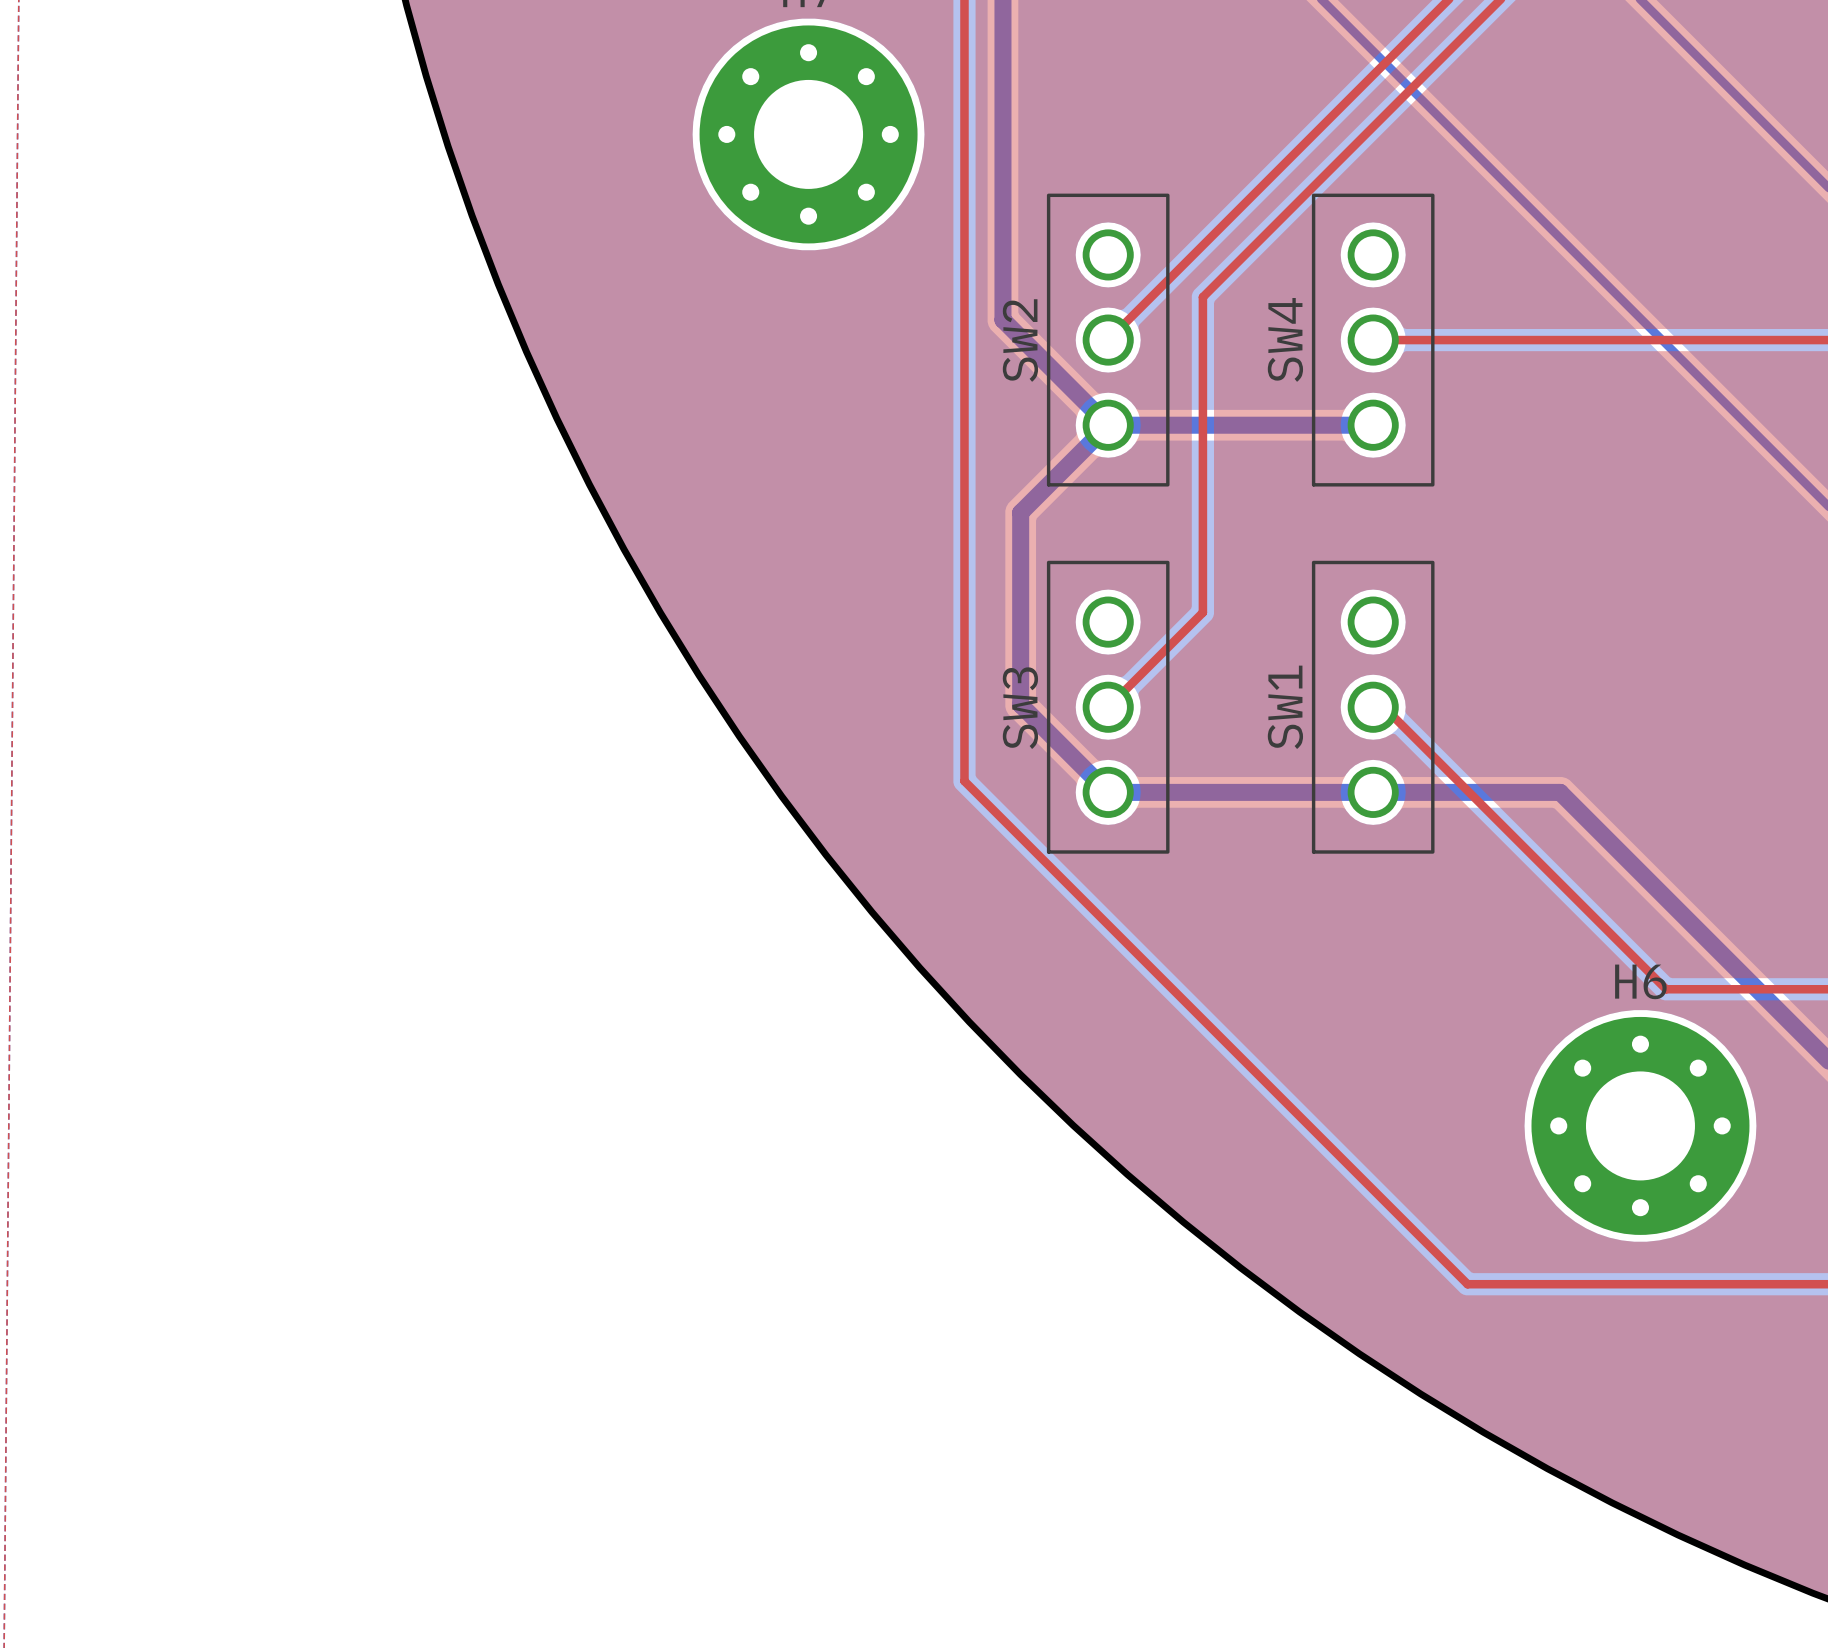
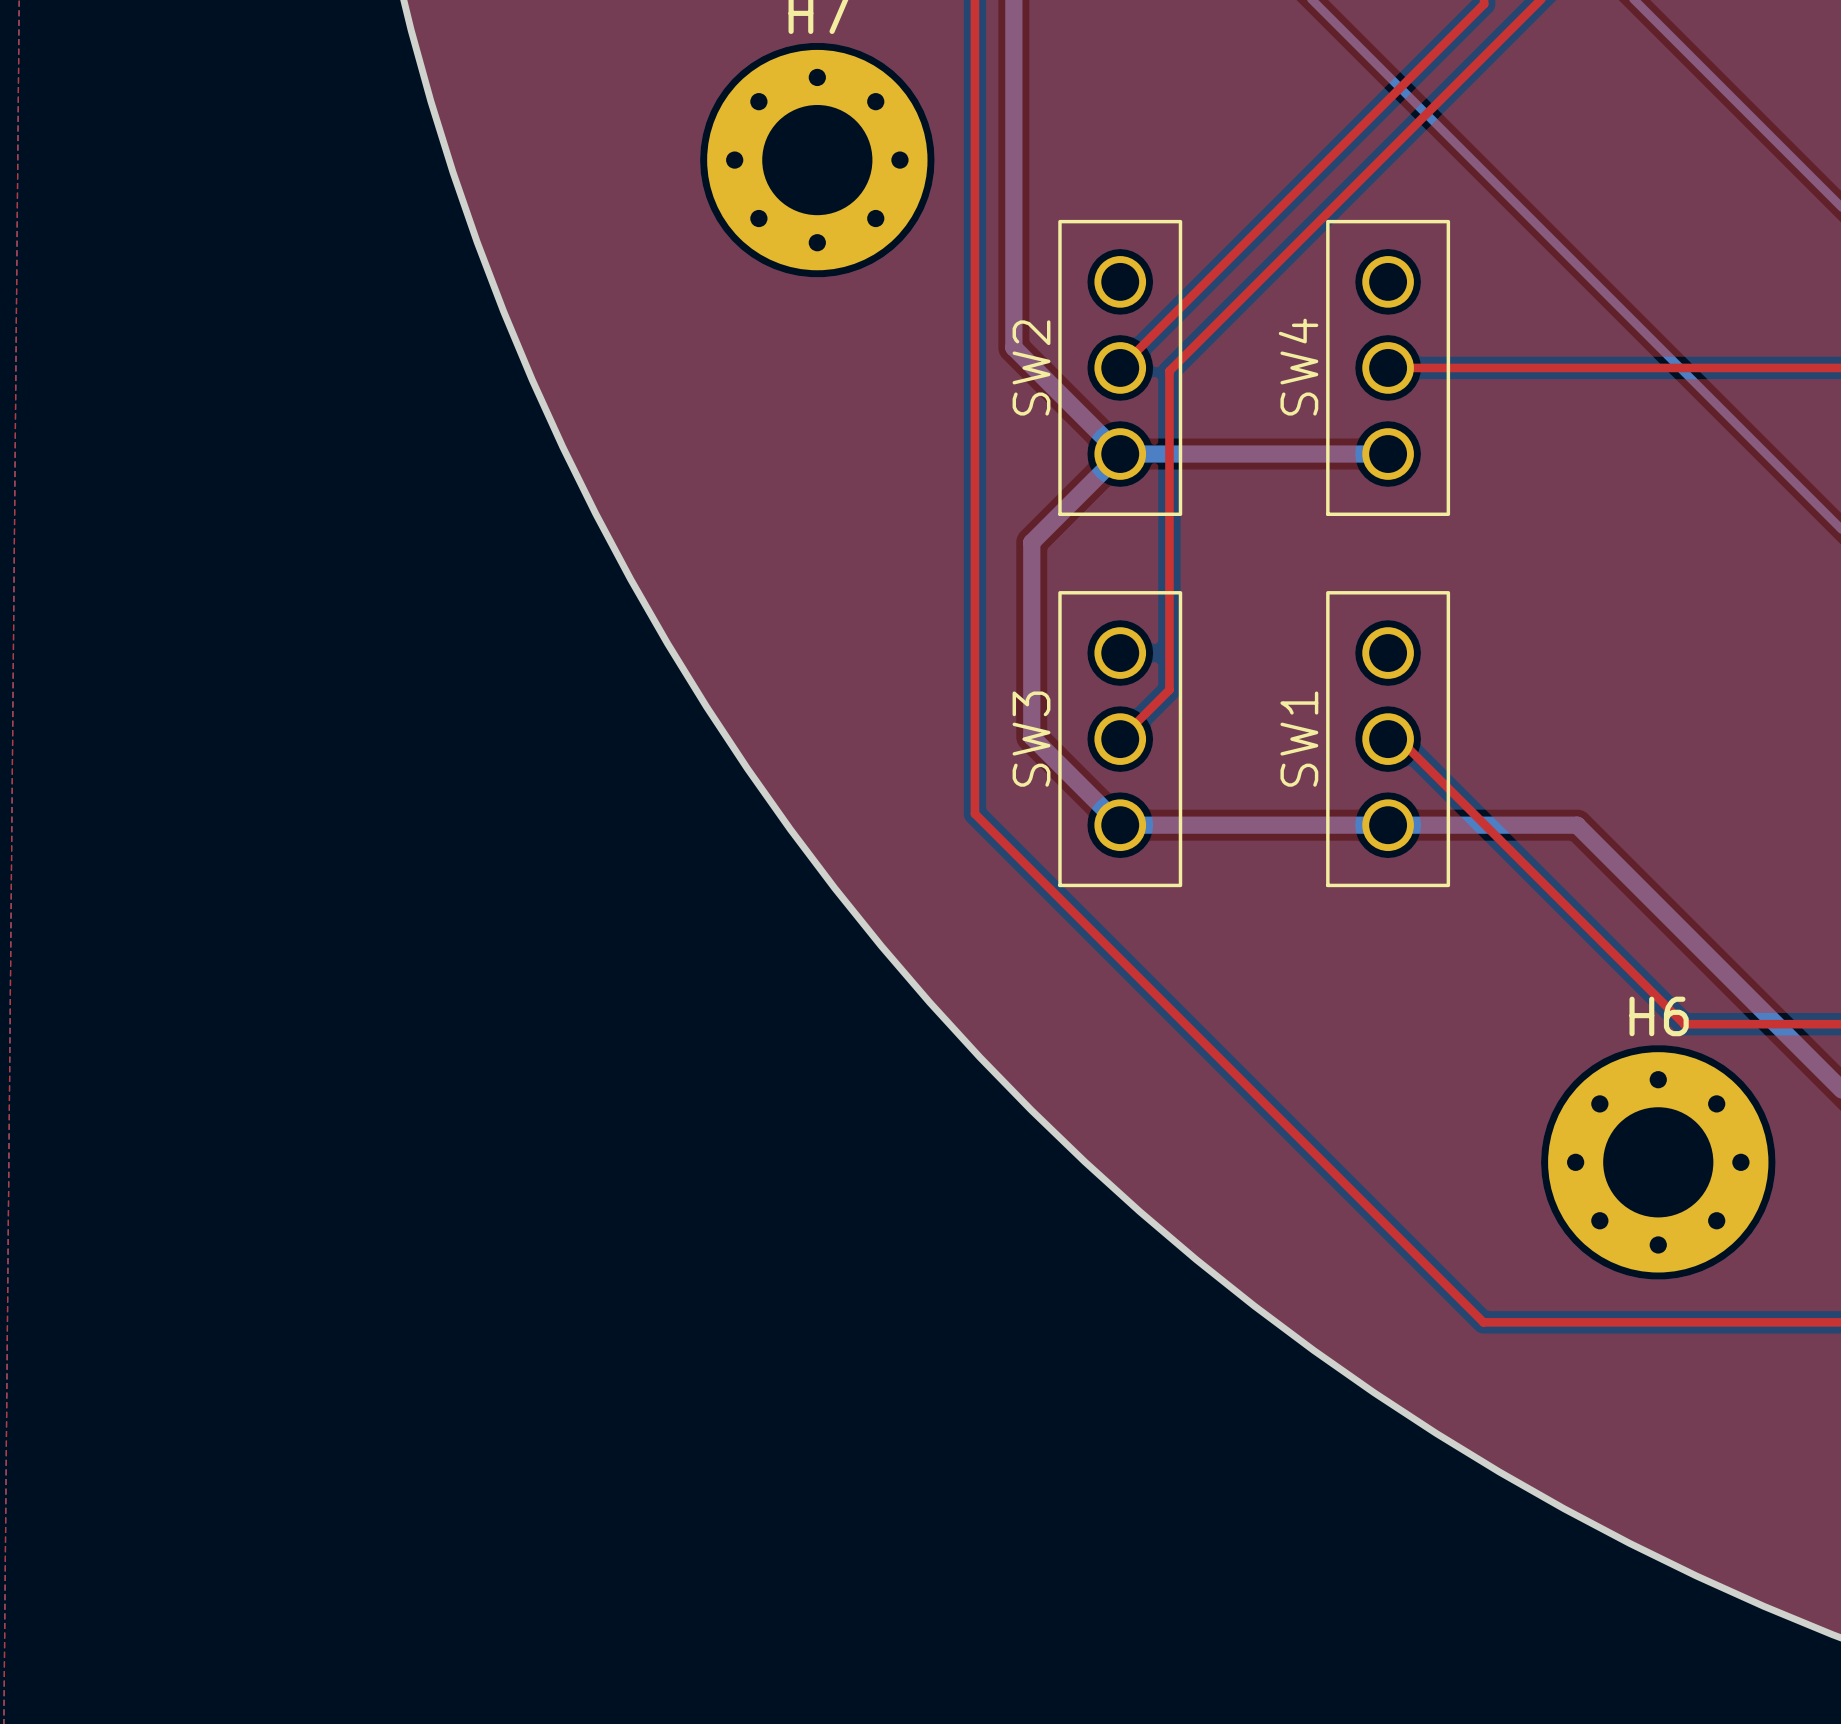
top track: (1202, 297) (1202, 612) (1156, 658) -> (1215, 324) (1169, 371) (1169, 689)

